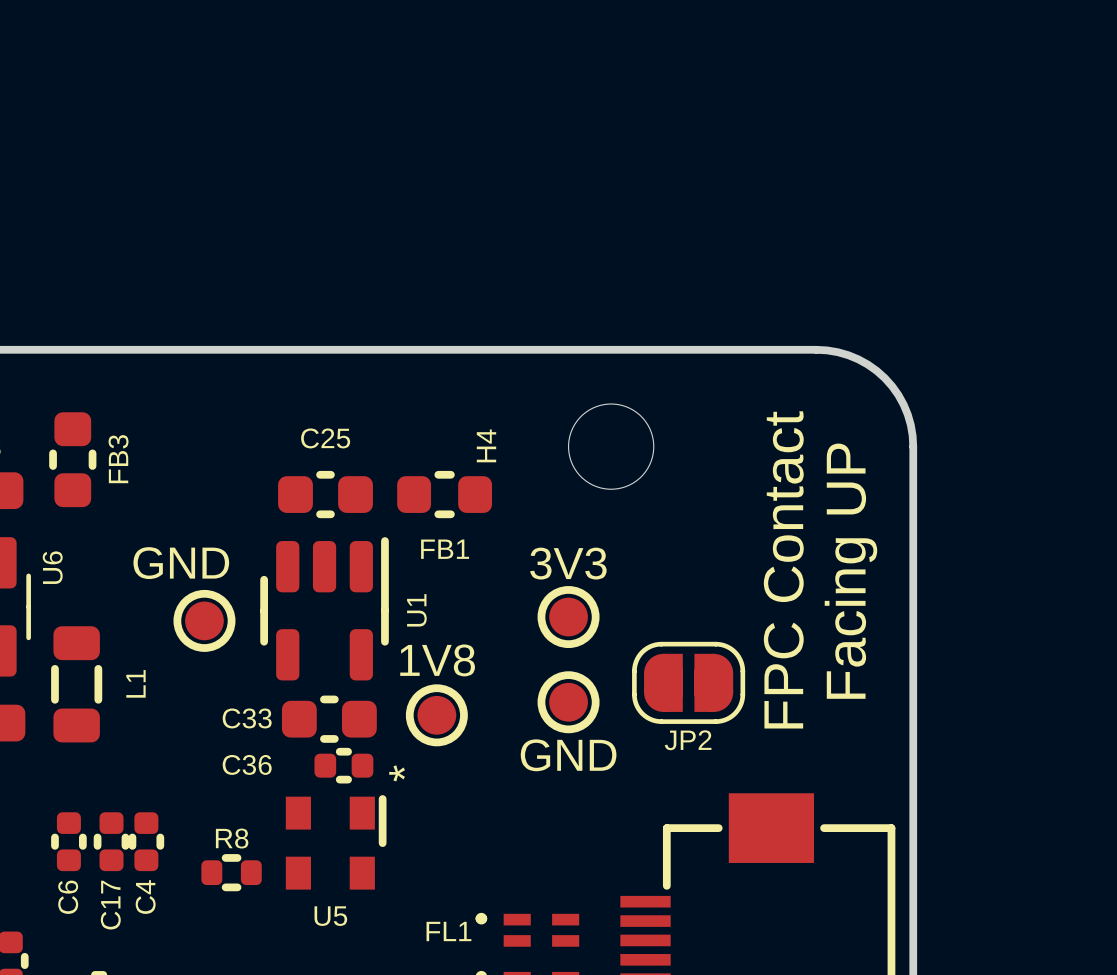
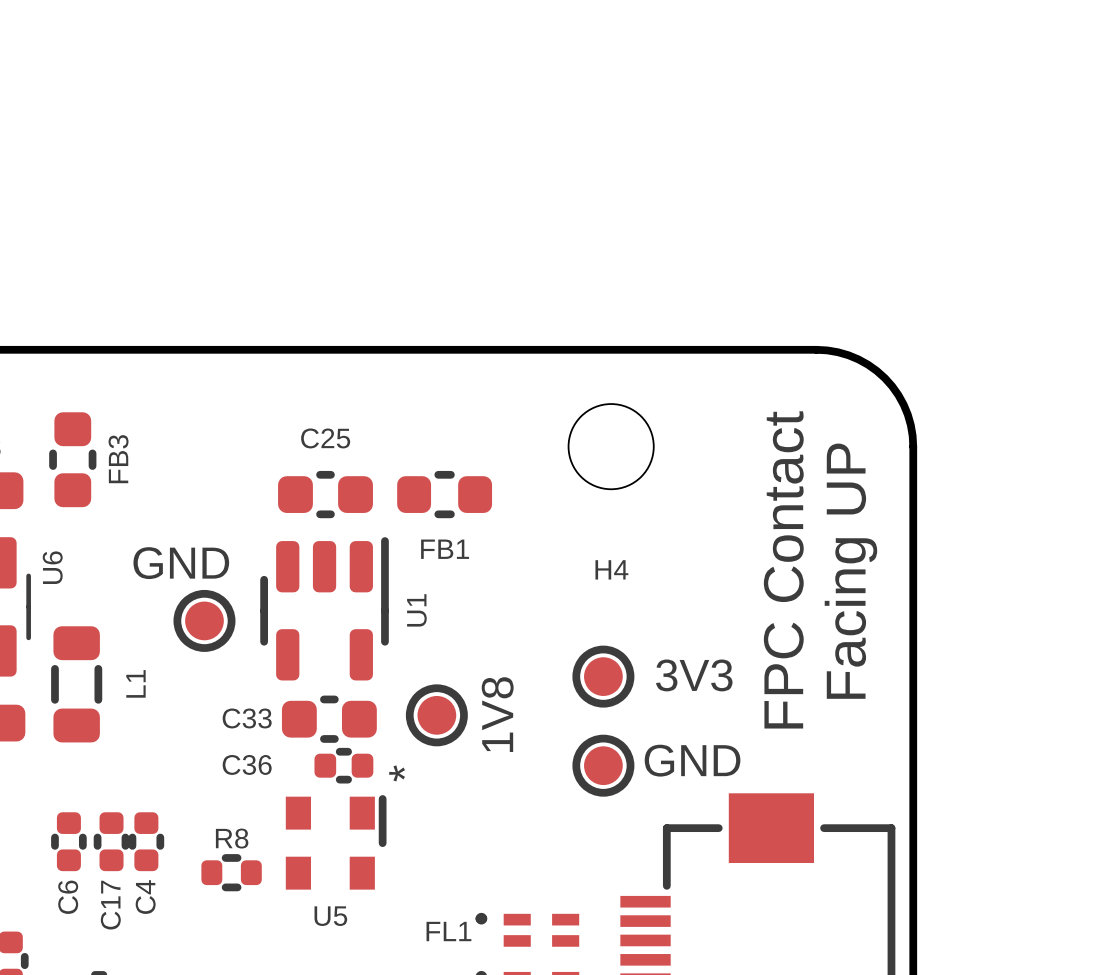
H4 name rotation: 0° (486, 445) -> 90° clockwise (611, 569)
H4 name position: H4 (486, 445) -> H4 (611, 569)
text position: 3V3 (568, 563) -> 3V3 (694, 675)
part: (568, 617) -> none
text rotation: 0° (437, 660) -> 90° counterclockwise (497, 714)
part: none -> (603, 676)
JP2: (688, 682) -> none
part: (568, 702) -> none
text position: GND (568, 755) -> GND (692, 760)
part: none -> (603, 765)

